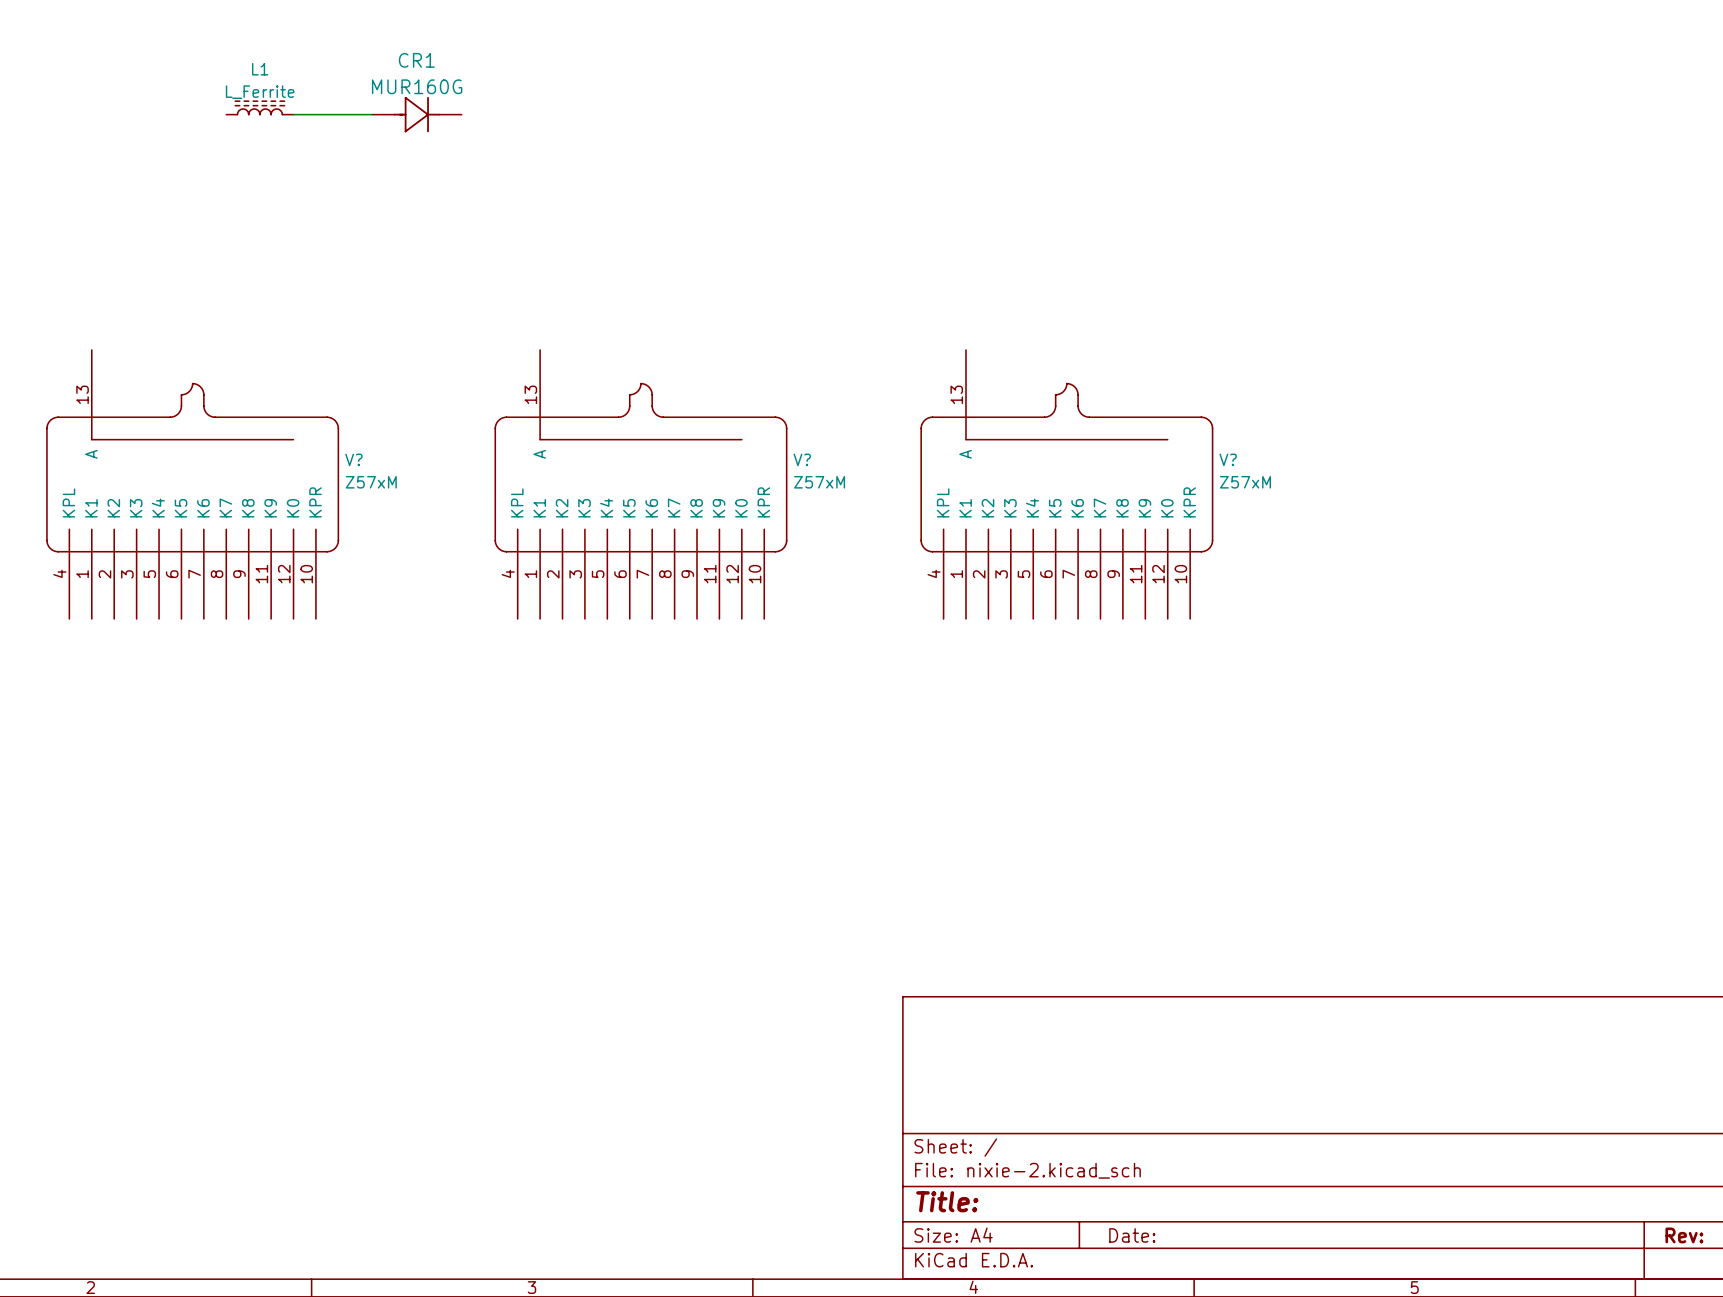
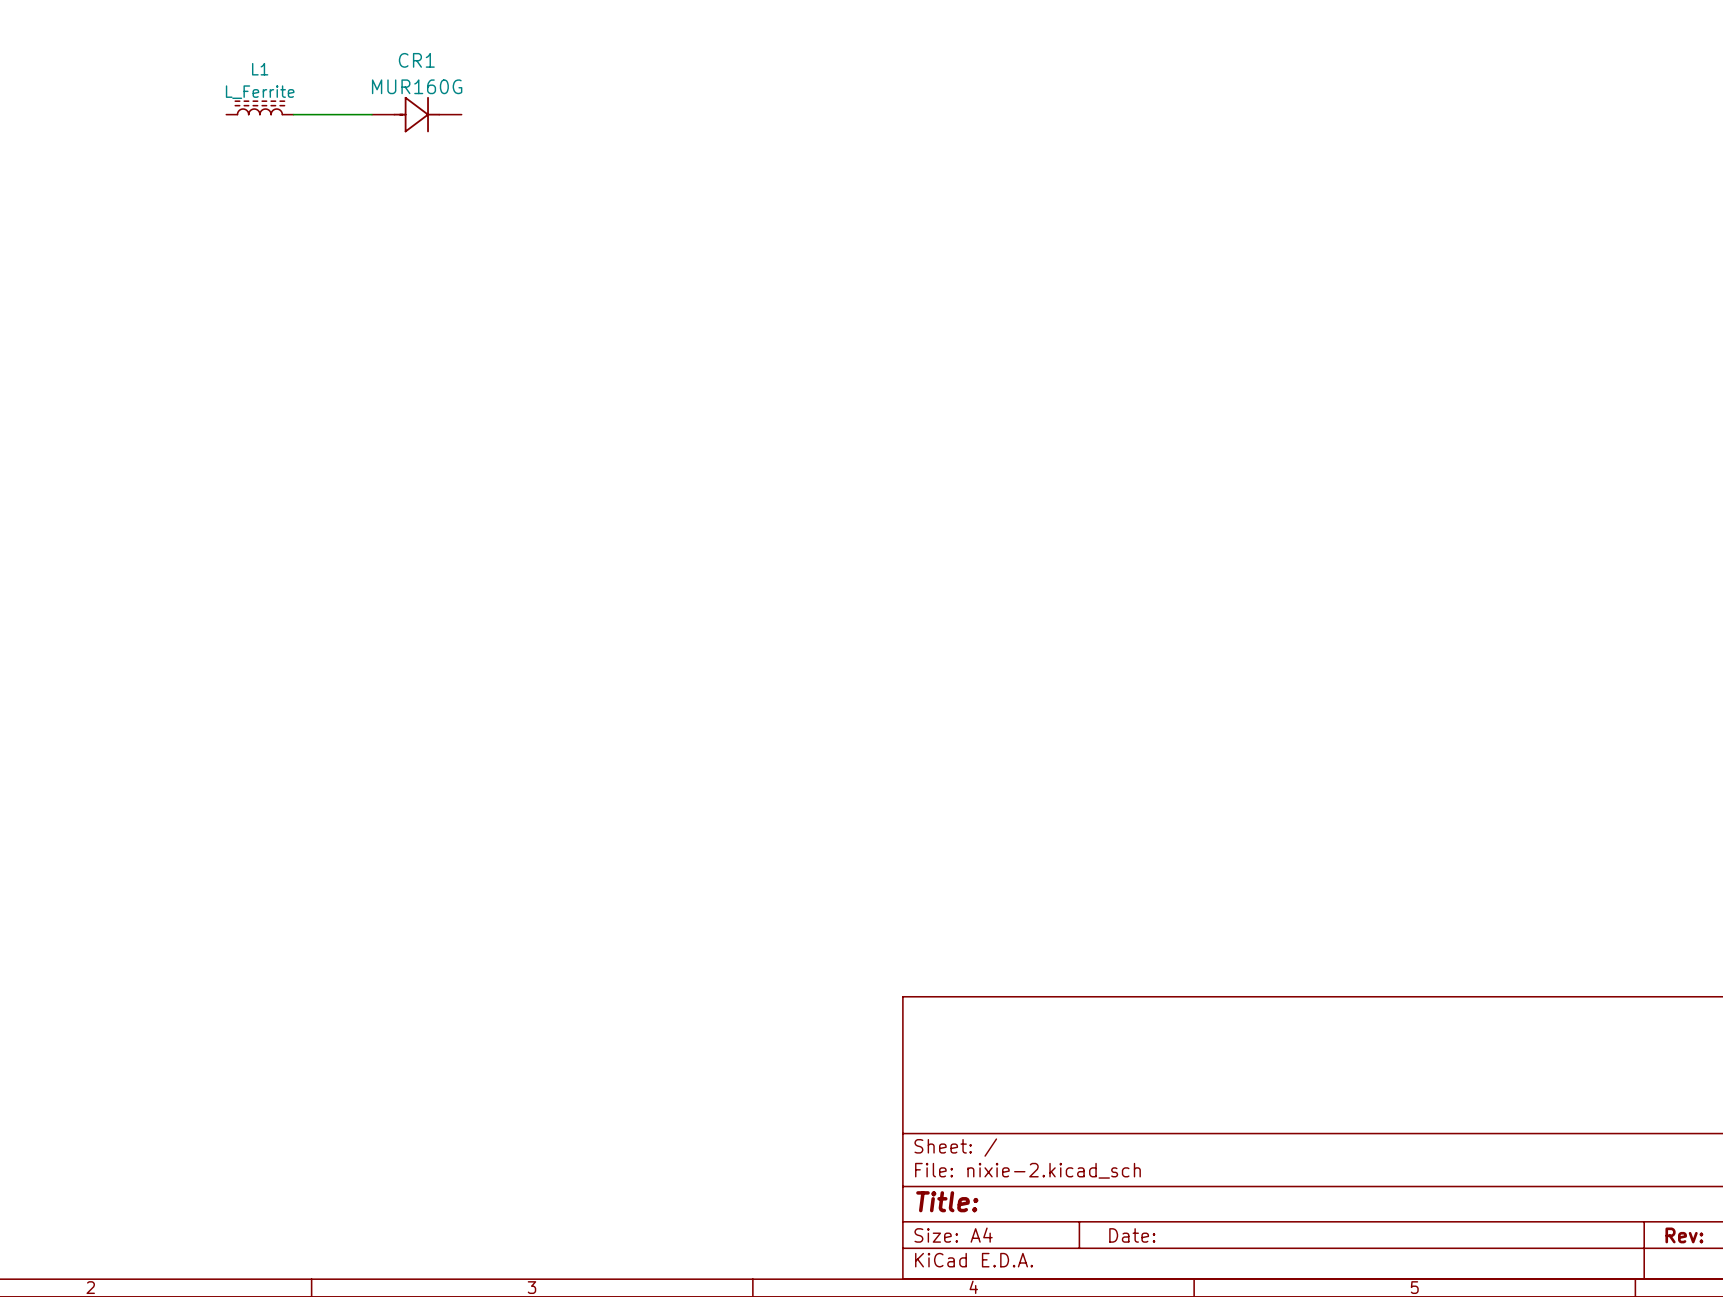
V?: Z57xM (192, 484) -> none
V?: Z57xM (640, 484) -> none
V?: Z57xM (1066, 484) -> none

